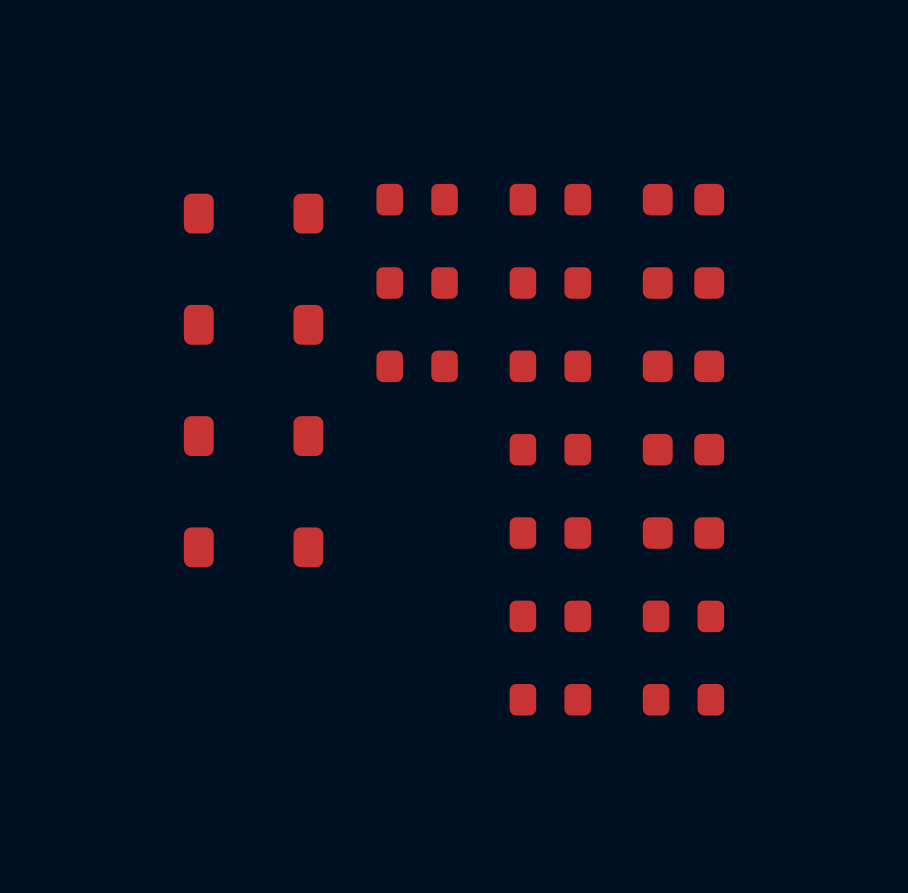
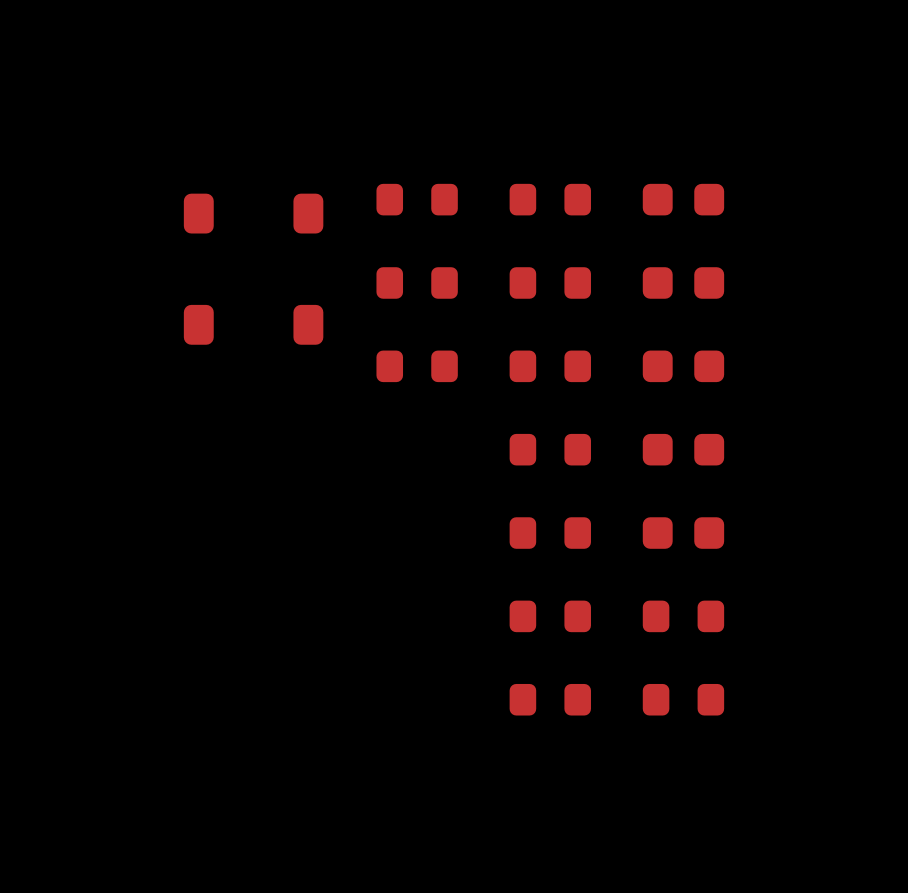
part: (253, 436) -> none
part: (253, 547) -> none

